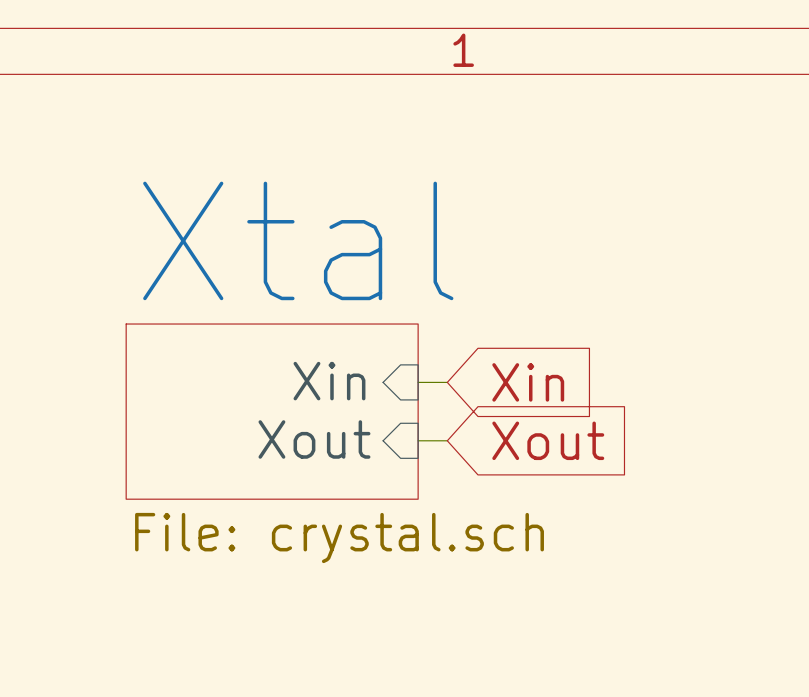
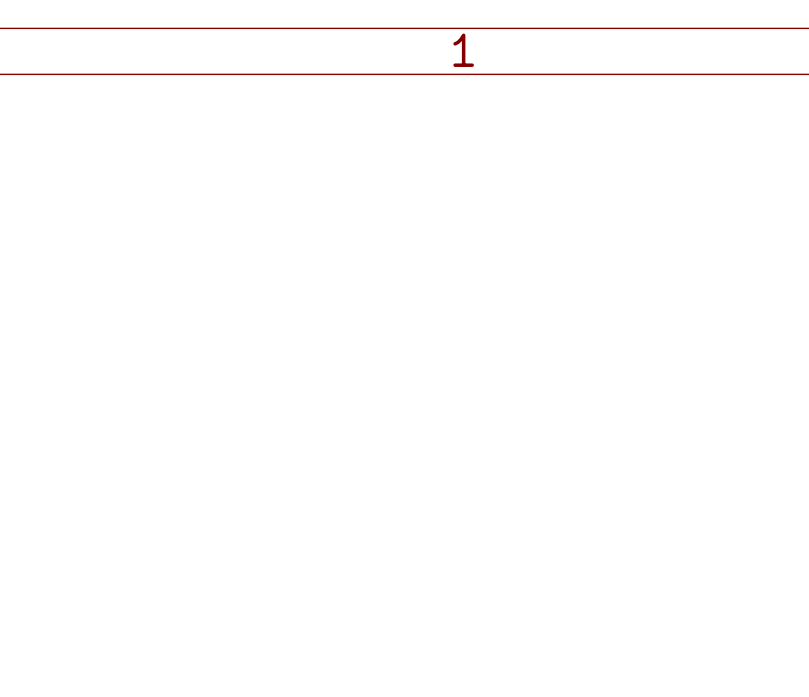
sheet pin: Xin (329, 381) -> none
wire: (418, 382) (447, 382) -> none
global label: Xin (528, 382) -> none
sheet Xtal: File: crystal.sch (272, 411) -> none
sheet pin: Xout (314, 439) -> none
wire: (418, 440) (447, 440) -> none
global label: Xout (548, 440) -> none

